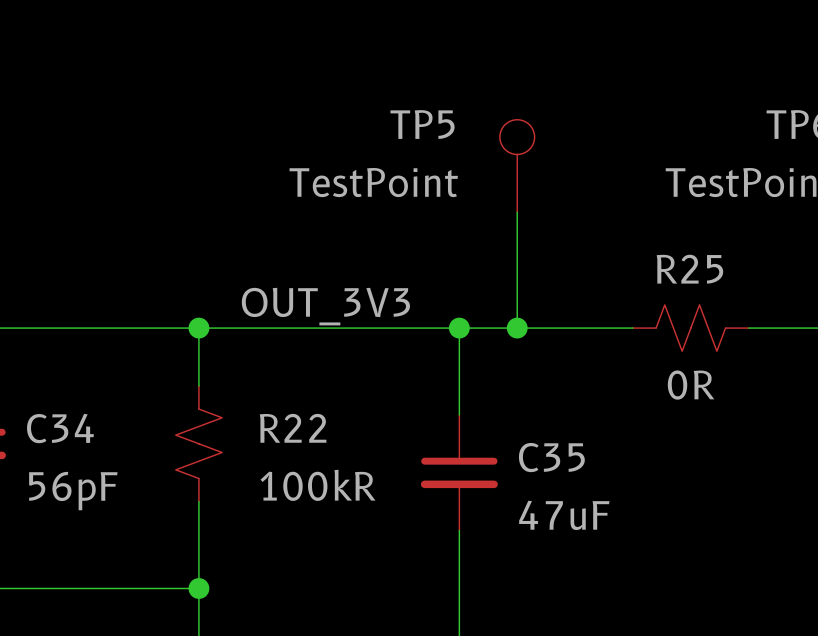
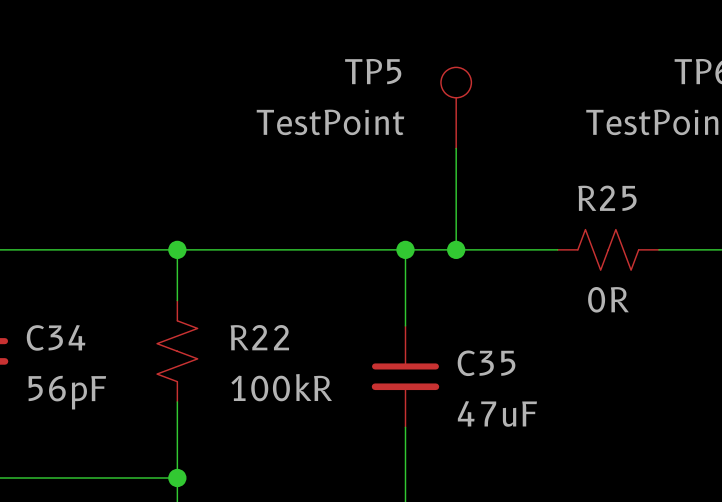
label: OUT_3V3 (325, 306) -> none

